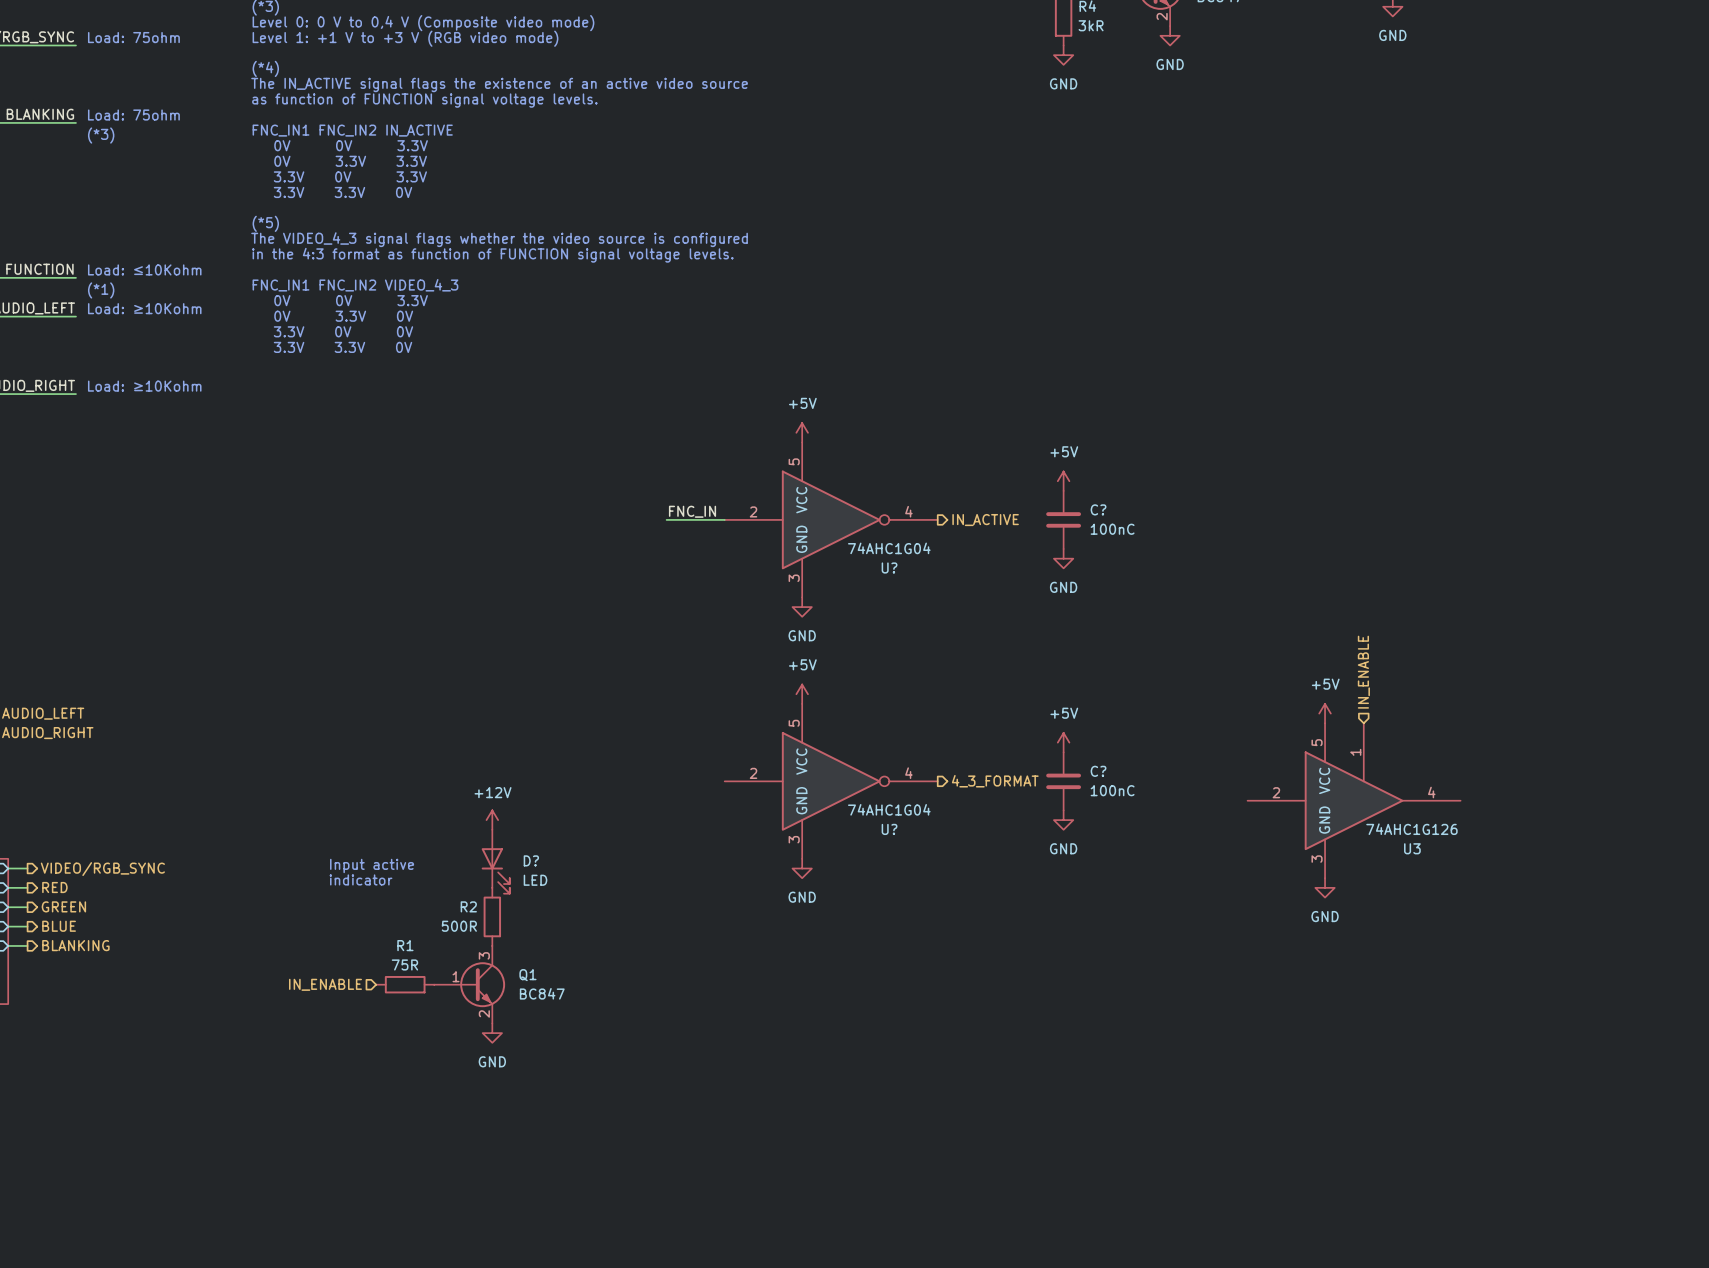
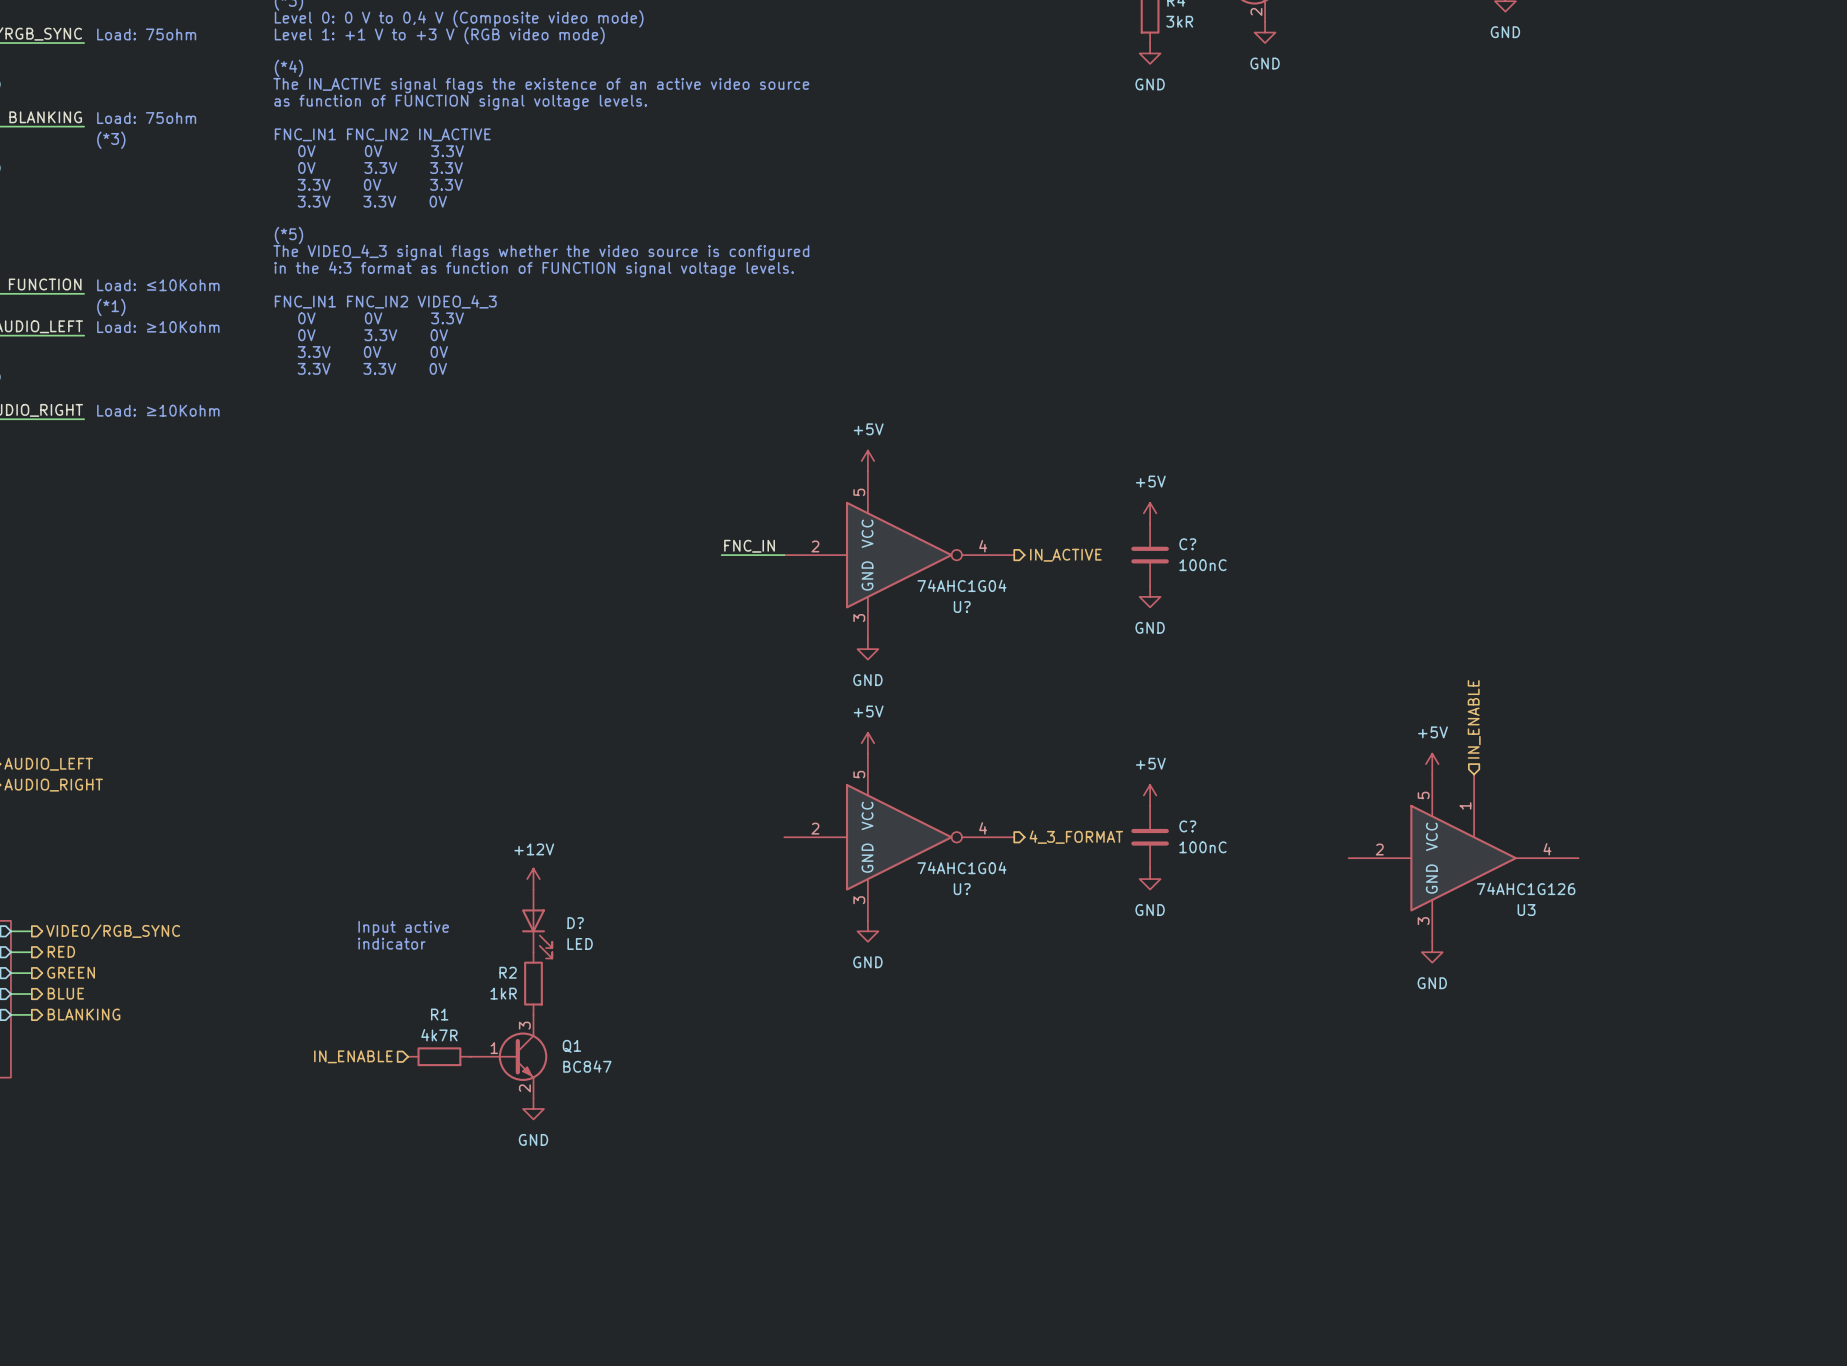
R2 value: 500R (459, 926) -> 1kR (503, 993)
R1 value: 75R (404, 964) -> 4k7R (439, 1035)

